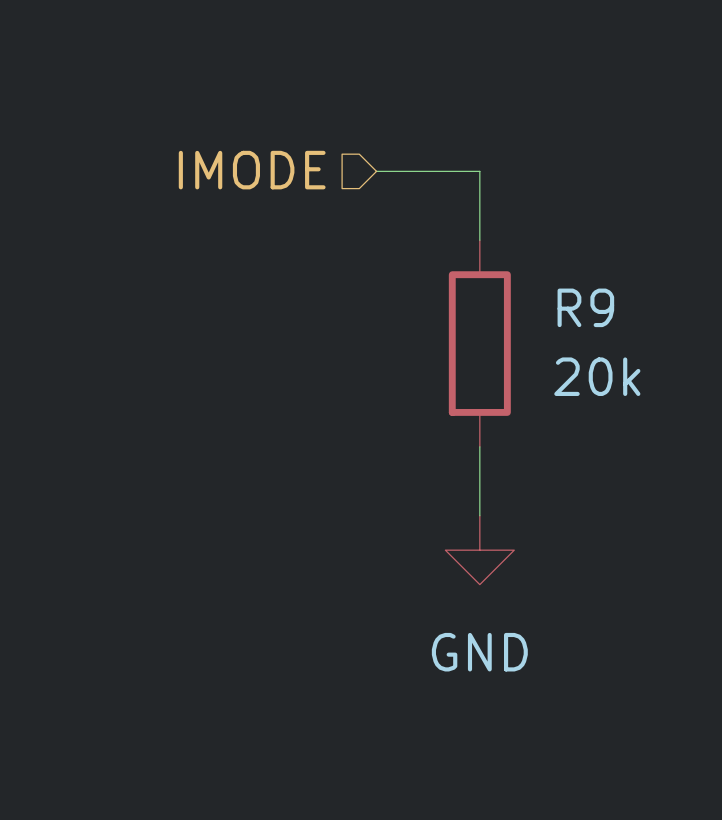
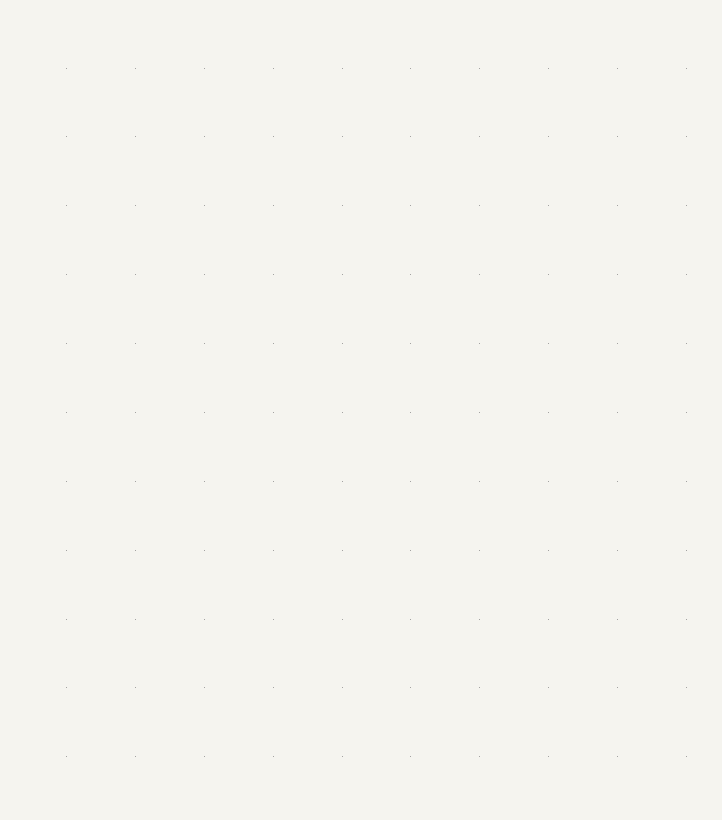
hierarchical label: IMODE (252, 170) -> none
wire: (376, 171) (479, 171) (479, 240) -> none
R9: 20k (479, 343) -> none
wire: (479, 446) (479, 515) -> none
power symbol: GND (479, 550) -> none

